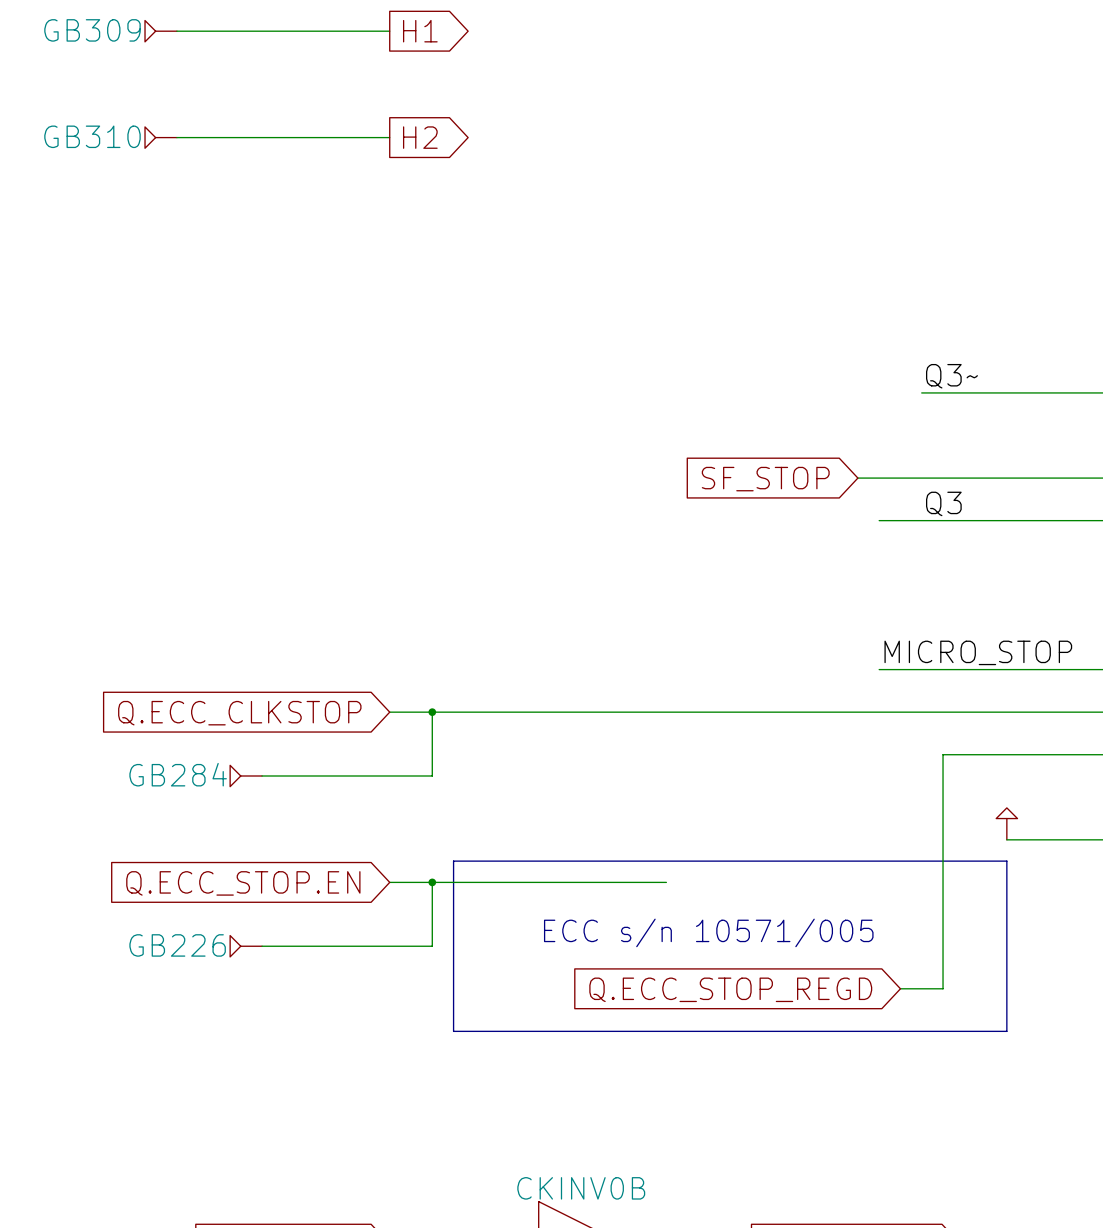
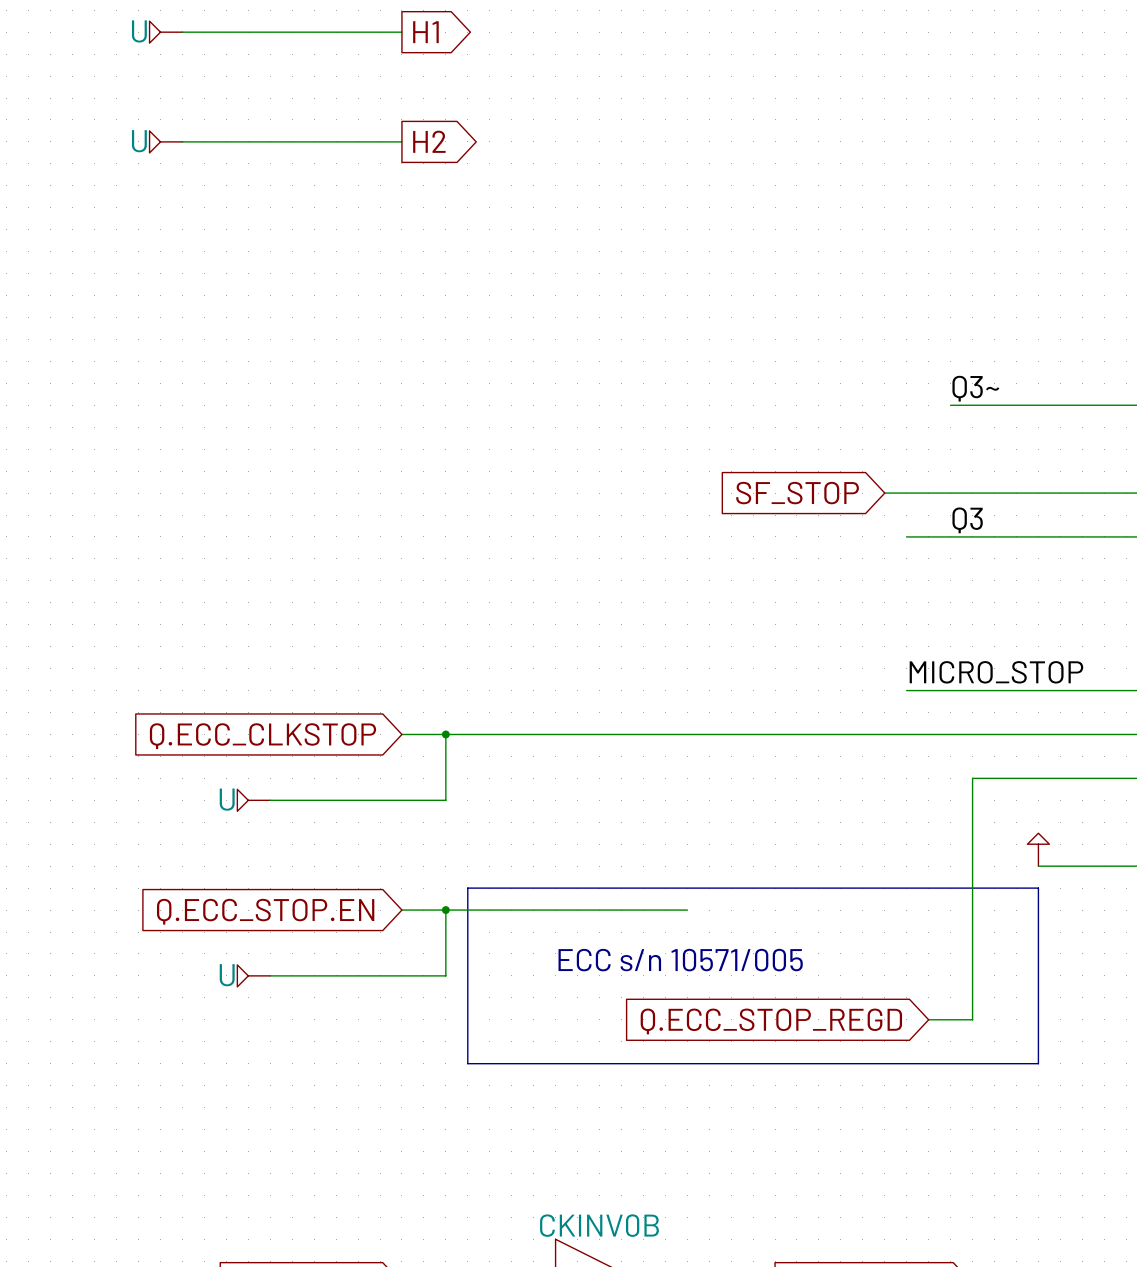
GB309 name: GB309 (92, 30) -> U (139, 31)
GB310 name: GB310 (92, 136) -> U (139, 141)
GB284 name: GB284 (178, 774) -> U (227, 799)
GB226 name: GB226 (177, 945) -> U (227, 975)

